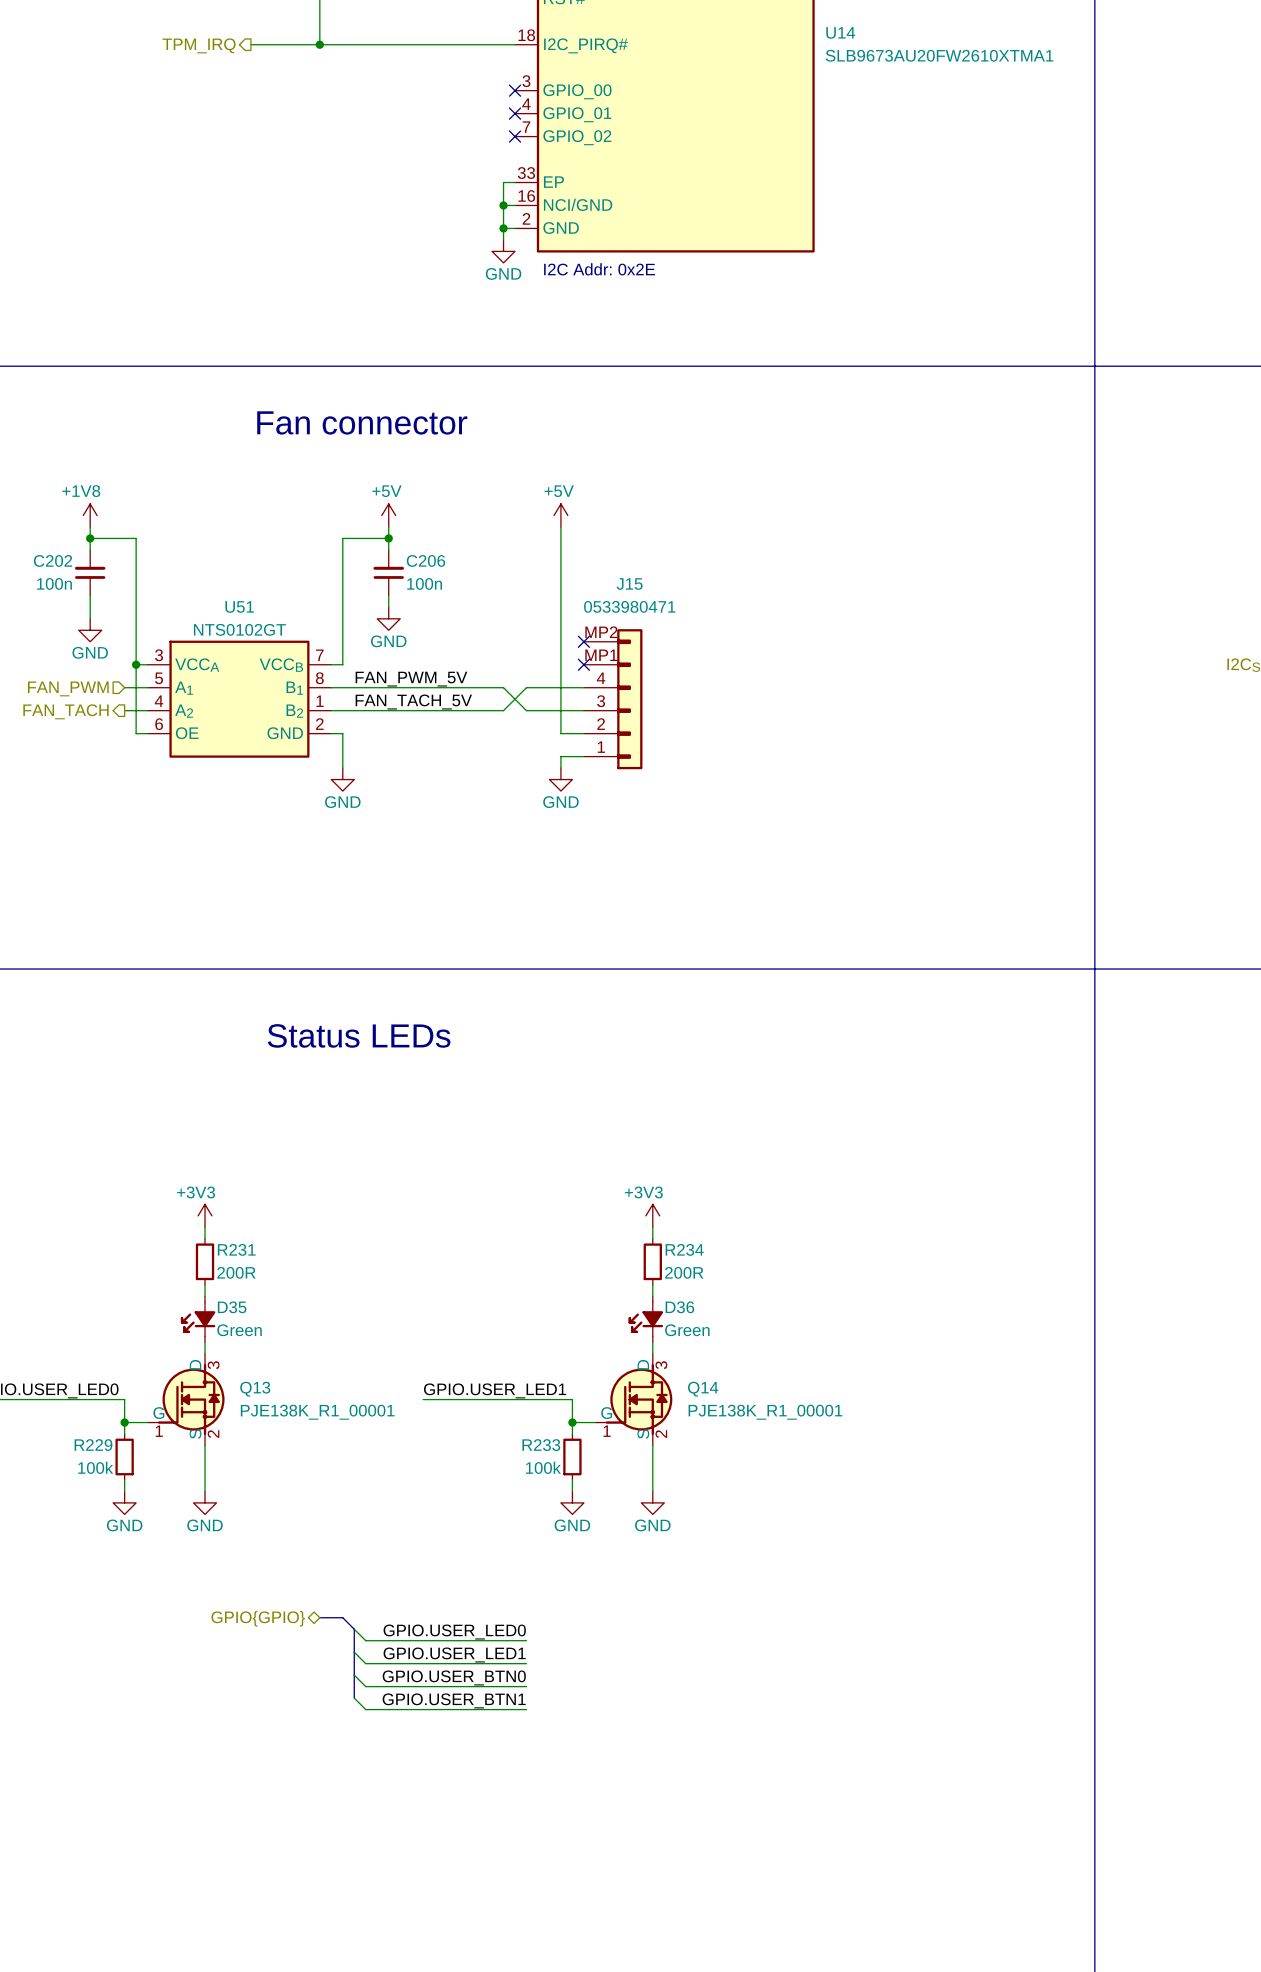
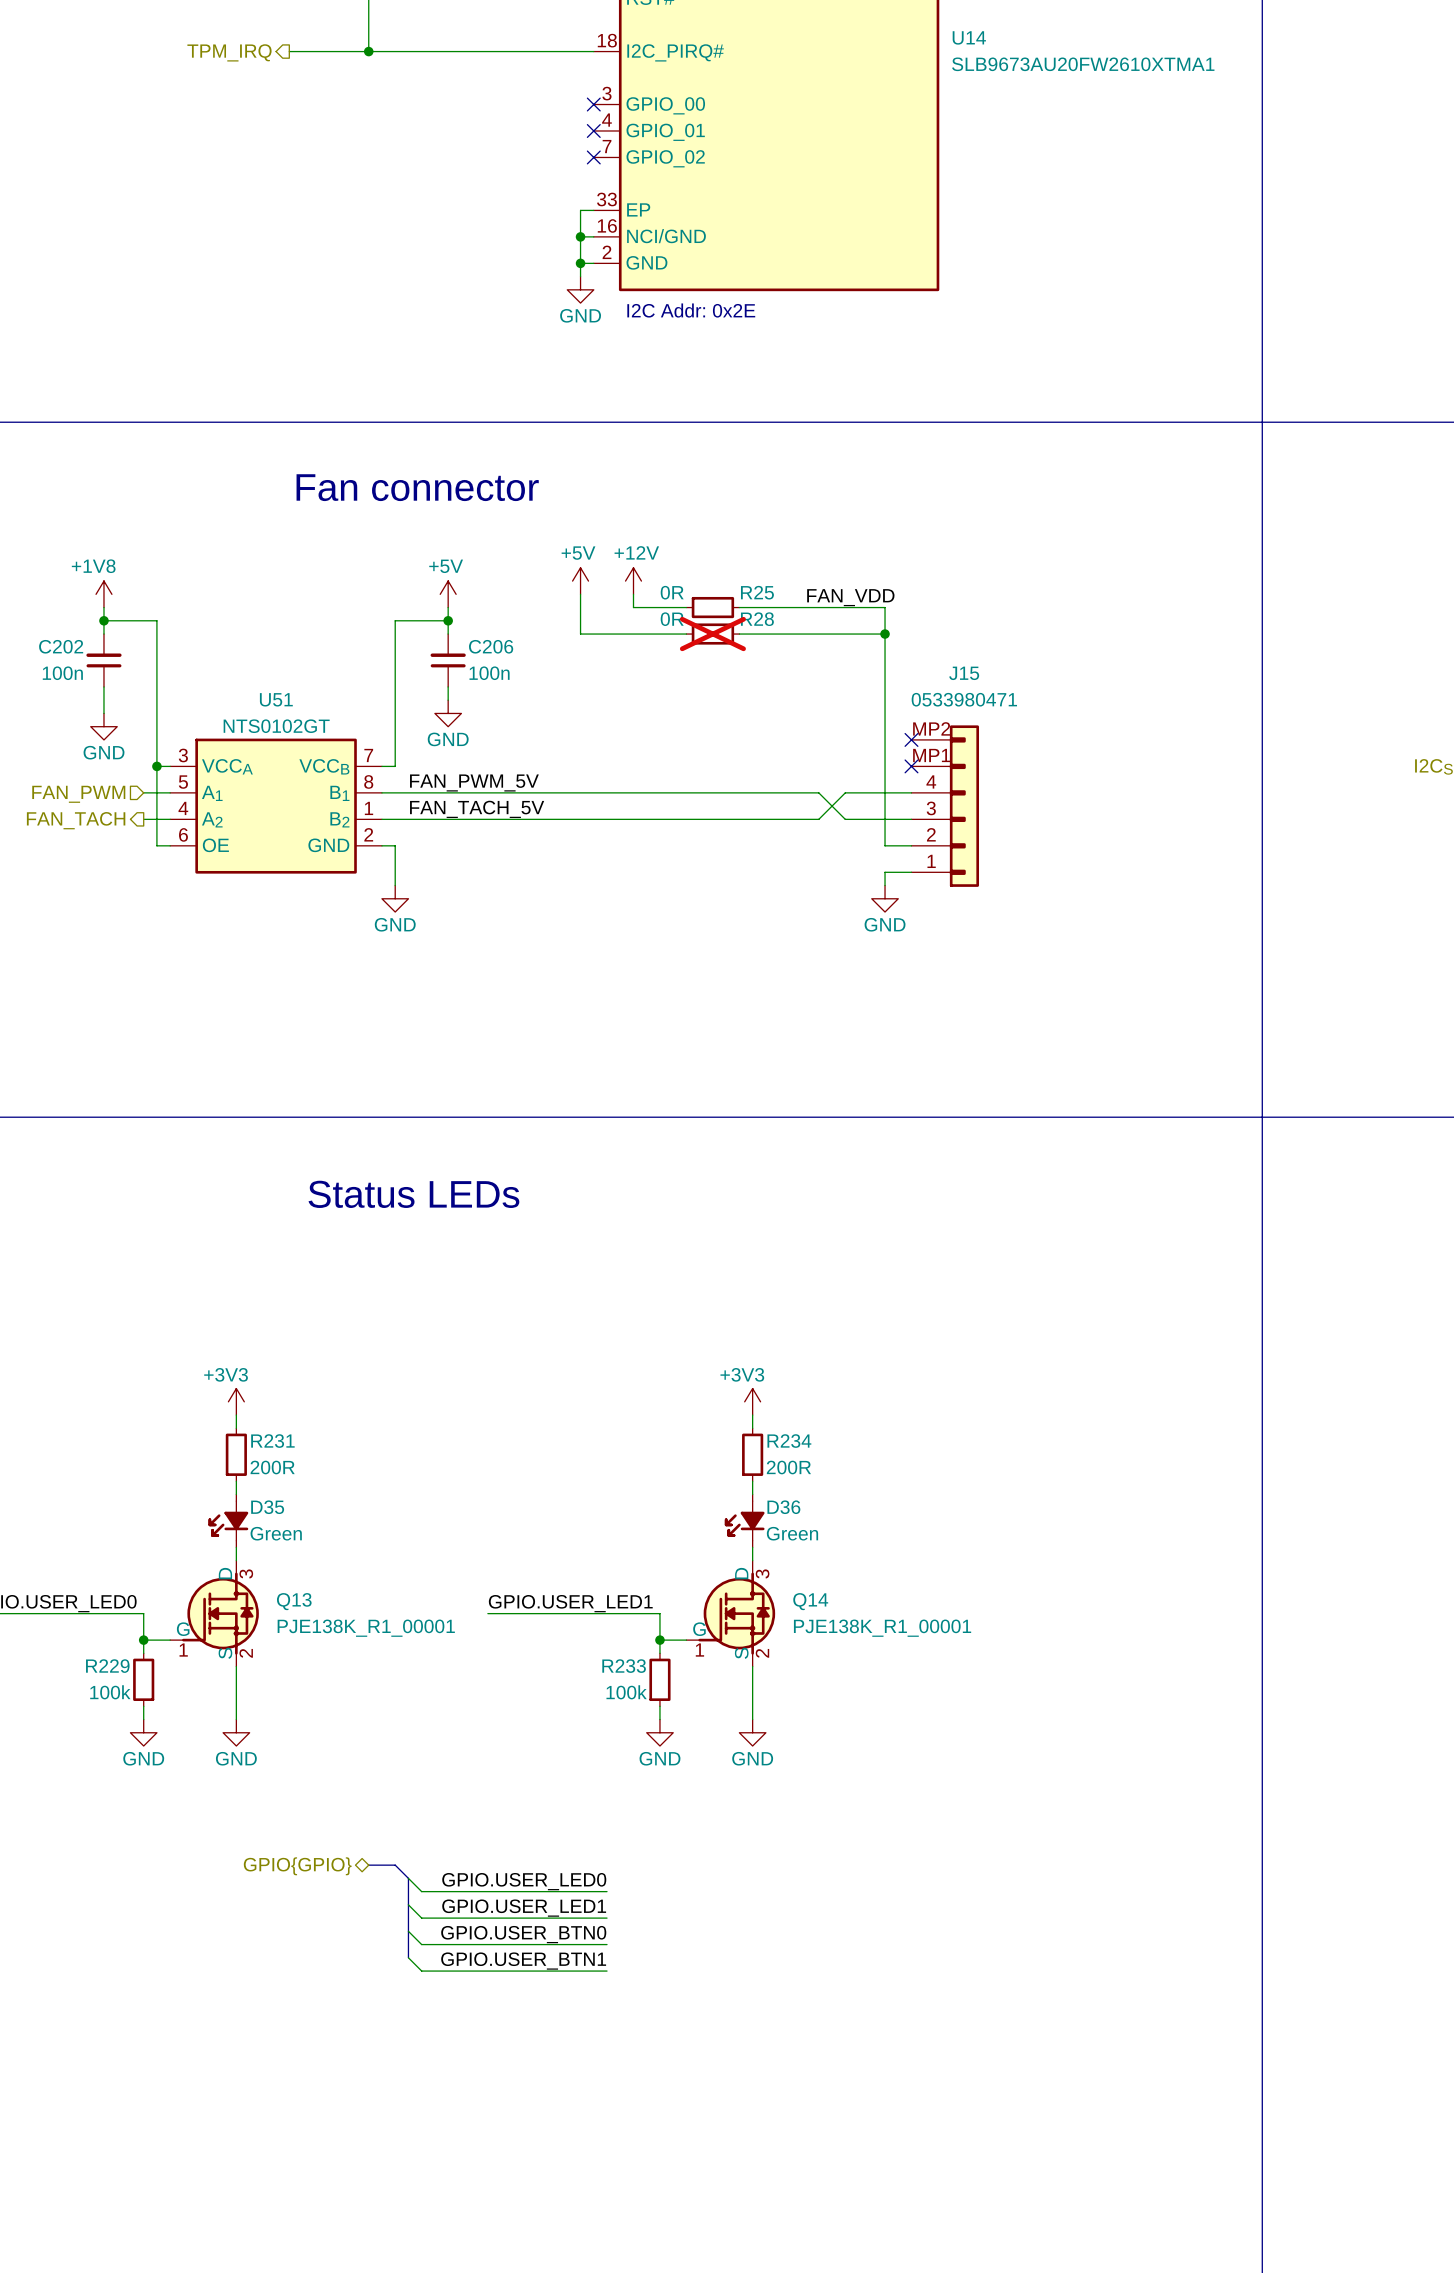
power symbol: none -> +12V (633, 581)
wire: none -> (580, 594) (580, 634) (686, 634)
wire: none -> (633, 594) (633, 607) (686, 607)
power symbol position: +5V (560, 515) -> +5V (580, 581)
label: none -> FAN_VDD (850, 597)
wire: (560, 526) (560, 733) (583, 733) -> none
R25: none -> (712, 607)
wire: none -> (739, 607) (885, 607) (885, 845) (911, 845)
R28: none -> (712, 634)
wire: none -> (739, 634) (885, 634)
junction: none -> (885, 634)
no-connect mark: (583, 641) -> none
no-connect mark: none -> (911, 739)
no-connect mark: (583, 664) -> none
no-connect mark: none -> (911, 766)
wire: (503, 687) (526, 710) -> (580, 792) (607, 792)
wire: (526, 687) (503, 710) -> (607, 819) (580, 819)
wire: none -> (673, 792) (818, 792) (845, 819) (911, 819)
wire: none -> (911, 792) (845, 792) (818, 819) (673, 819)
J15 position: (613, 699) -> (945, 806)
wire: (583, 756) (560, 756) (560, 768) -> (911, 872) (885, 872) (885, 885)
power symbol position: GND (560, 779) -> GND (885, 898)

